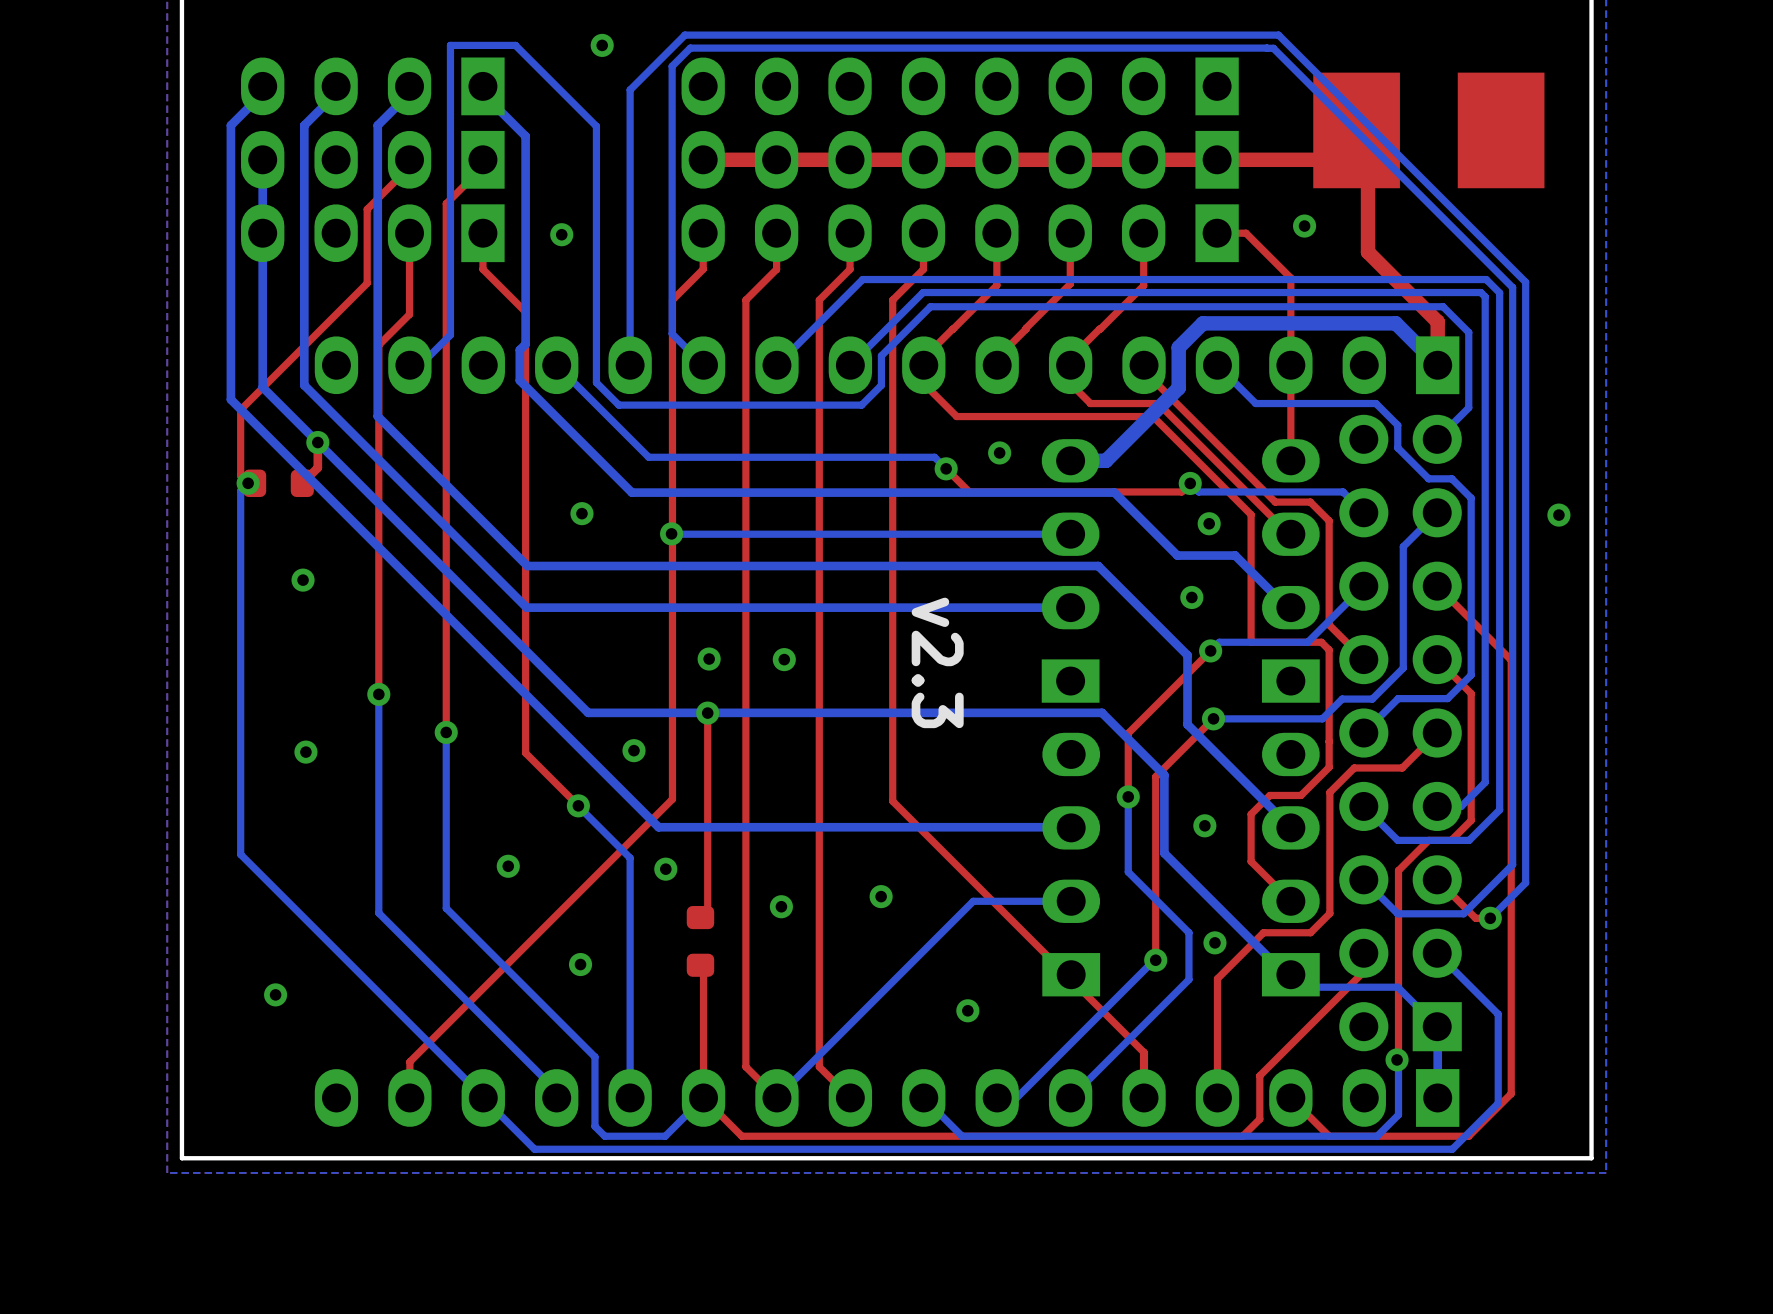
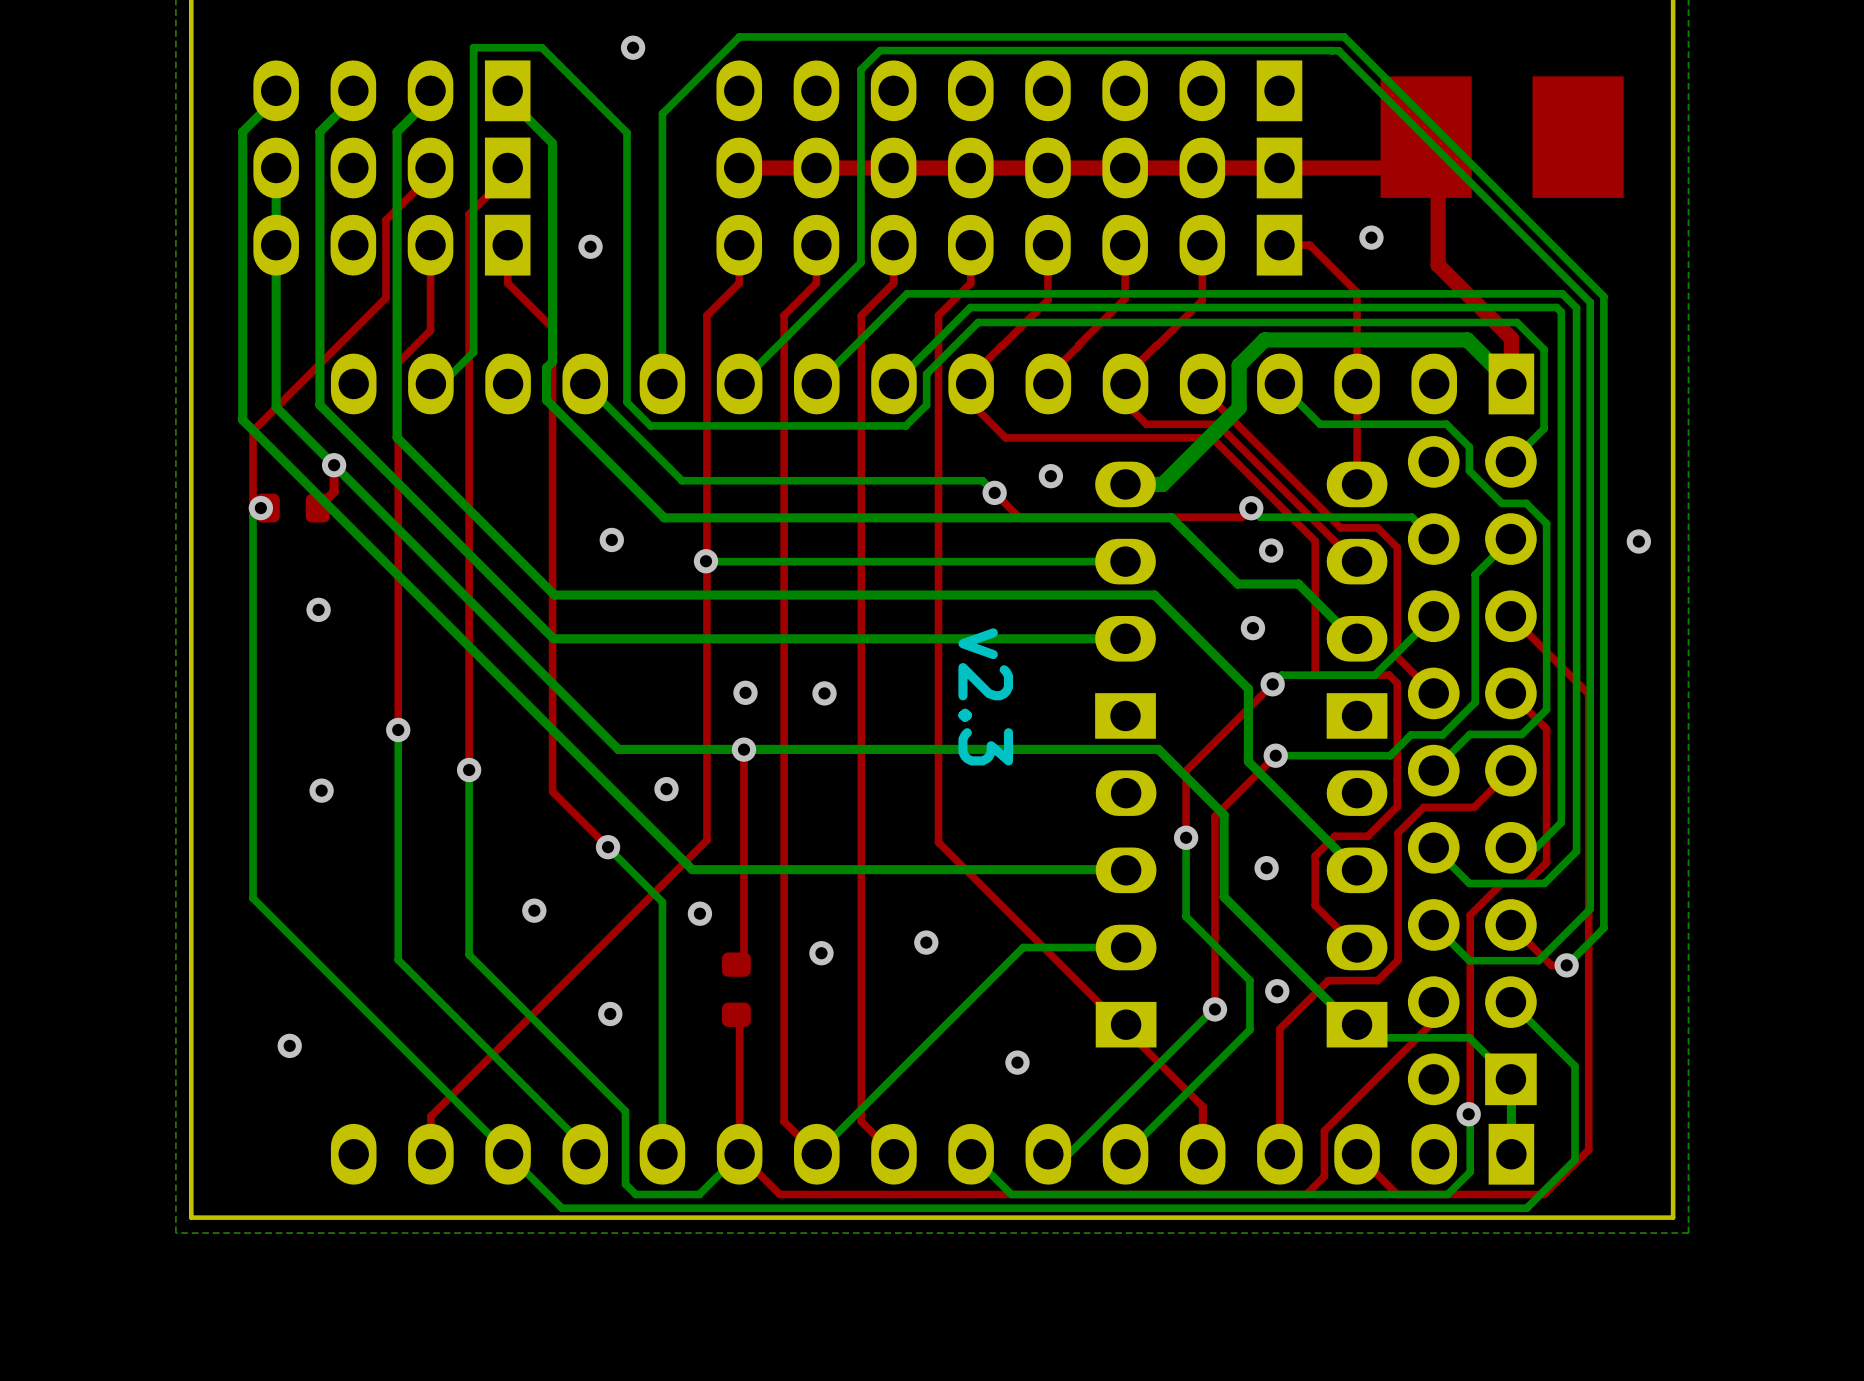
bottom track: (703, 35) (684, 35) (630, 89) (630, 108) -> (706, 69) (662, 113)
bottom track: (837, 48) (690, 48) -> (739, 36) (725, 50)
bottom track: (672, 66) (672, 333) (703, 365) -> (880, 50) (860, 69) (860, 262) (739, 383)

